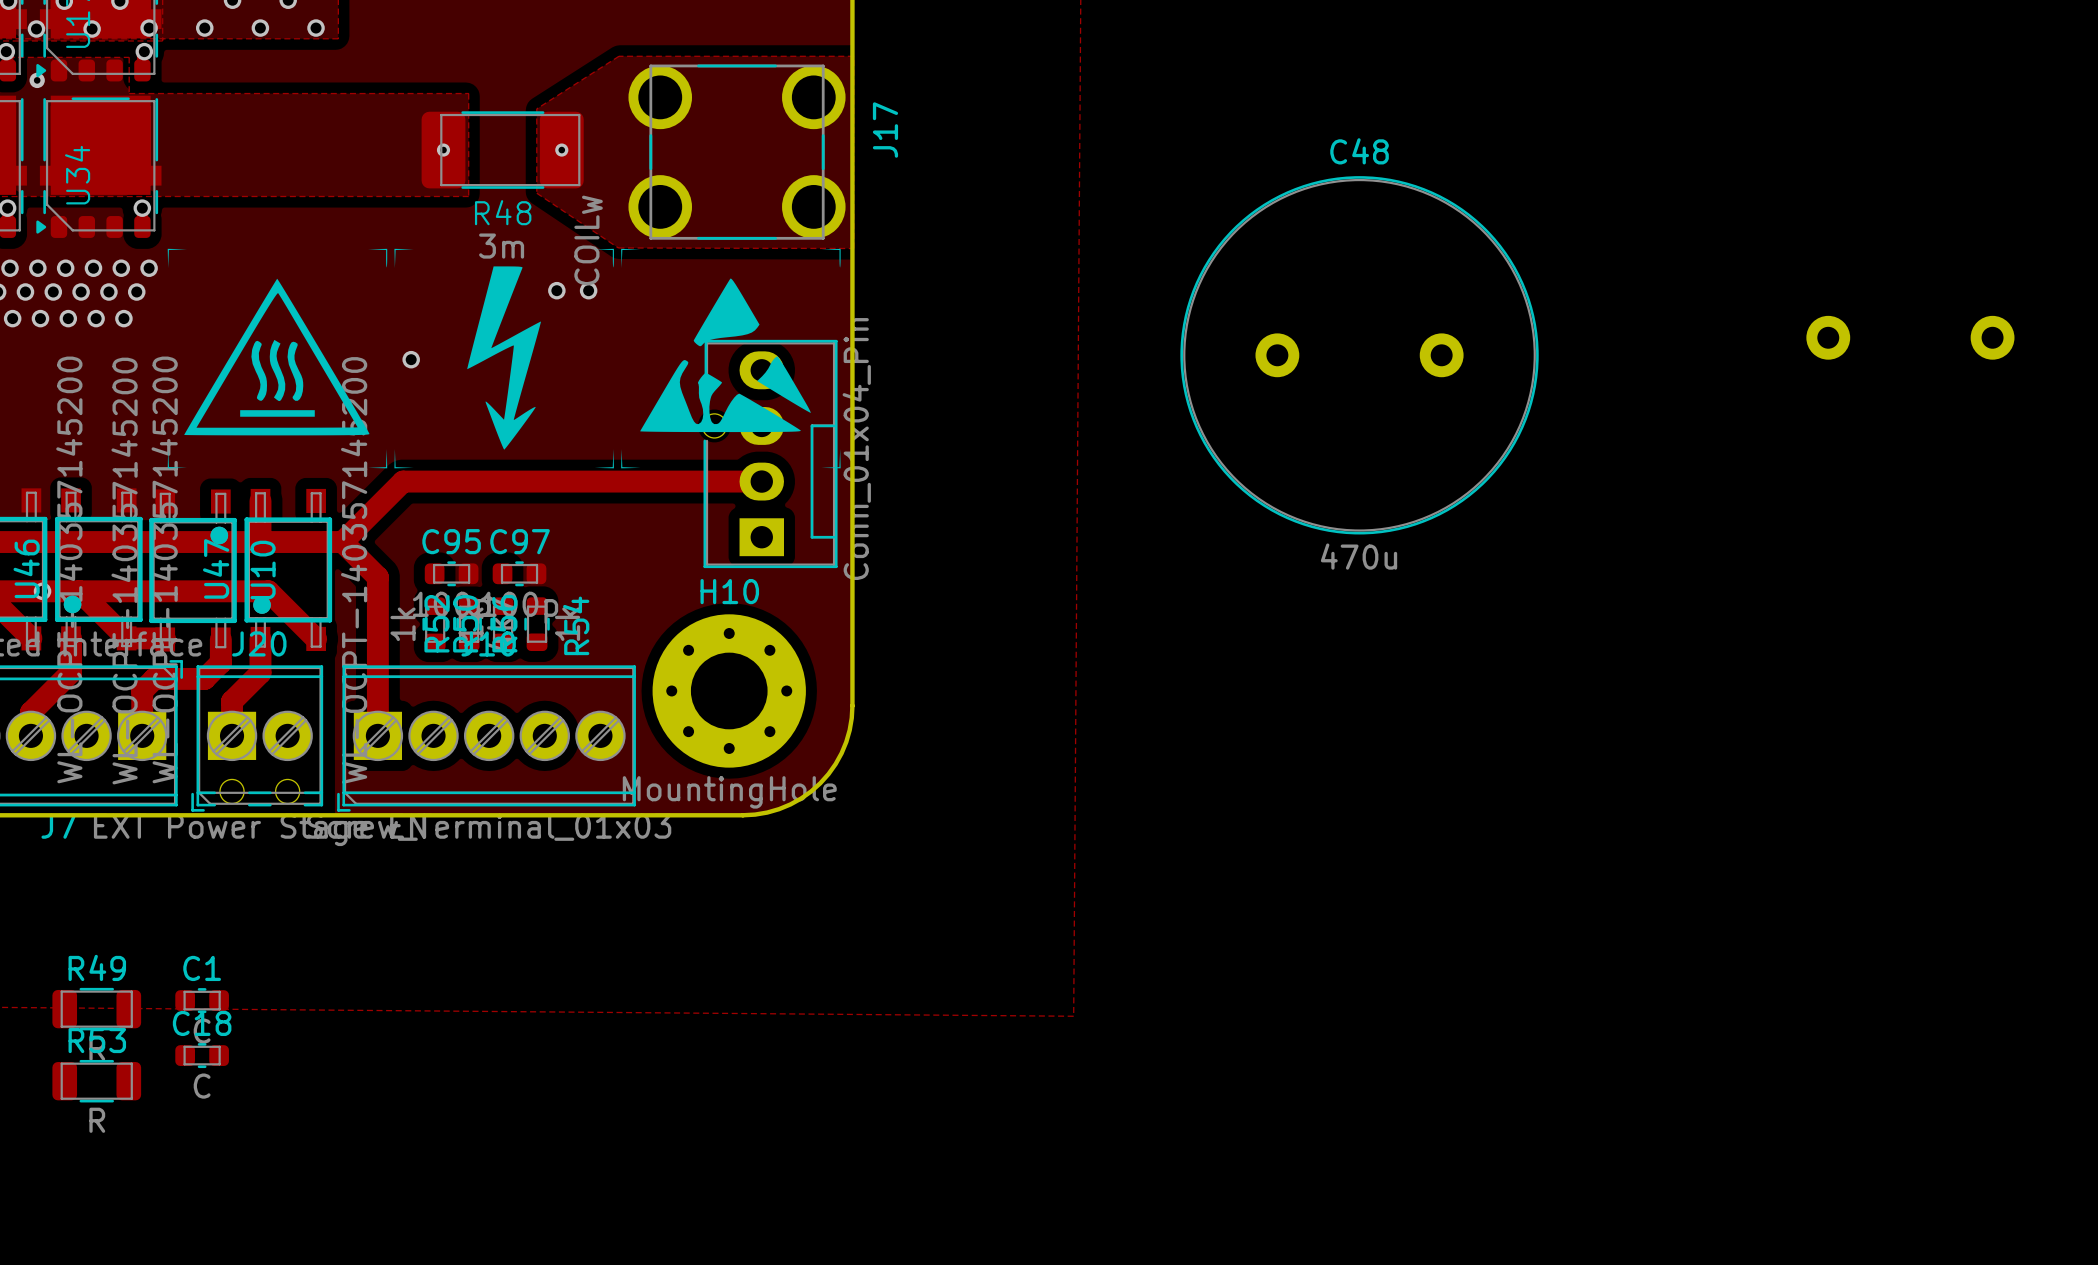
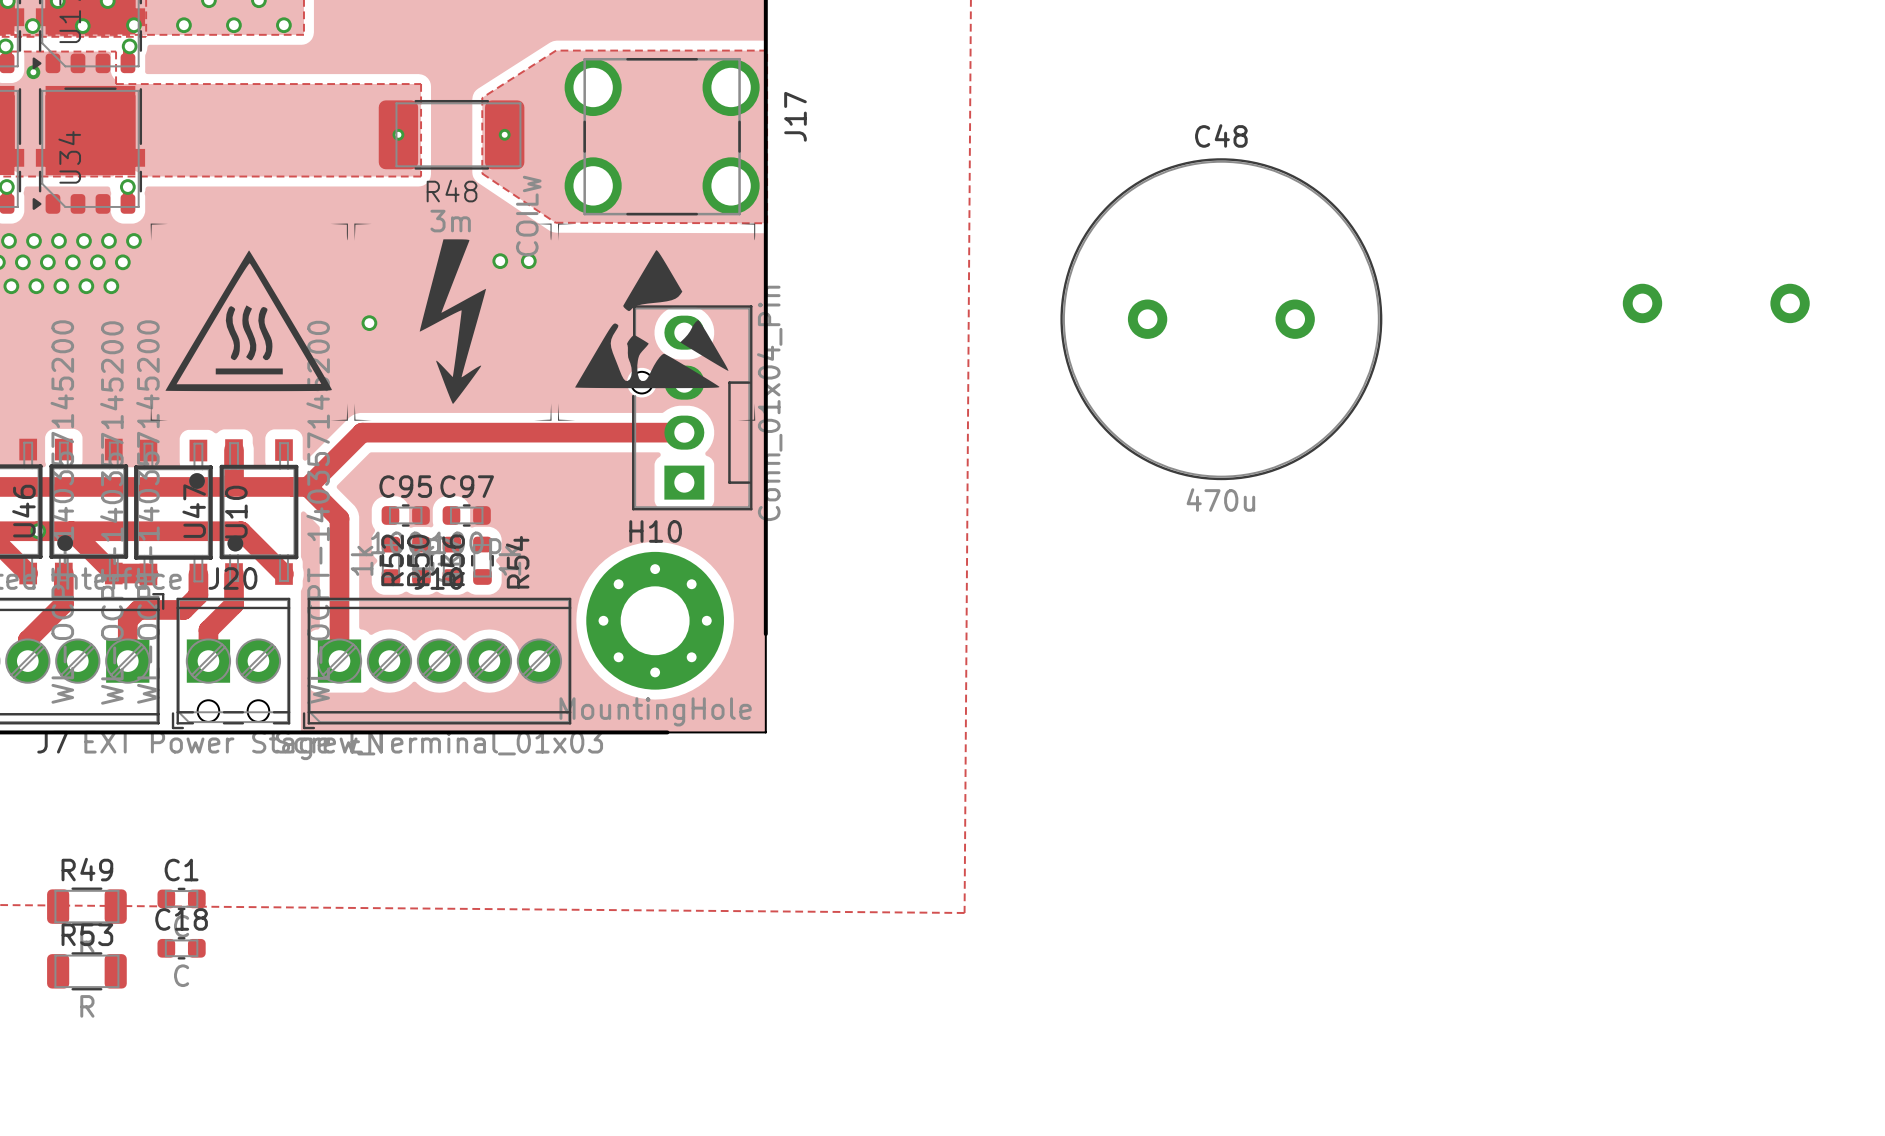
board edge: (852, 705) (846, 741) (835, 764) (820, 783) (801, 798) (779, 809) (742, 815) -> (765, 634) (765, 732) (667, 732)

